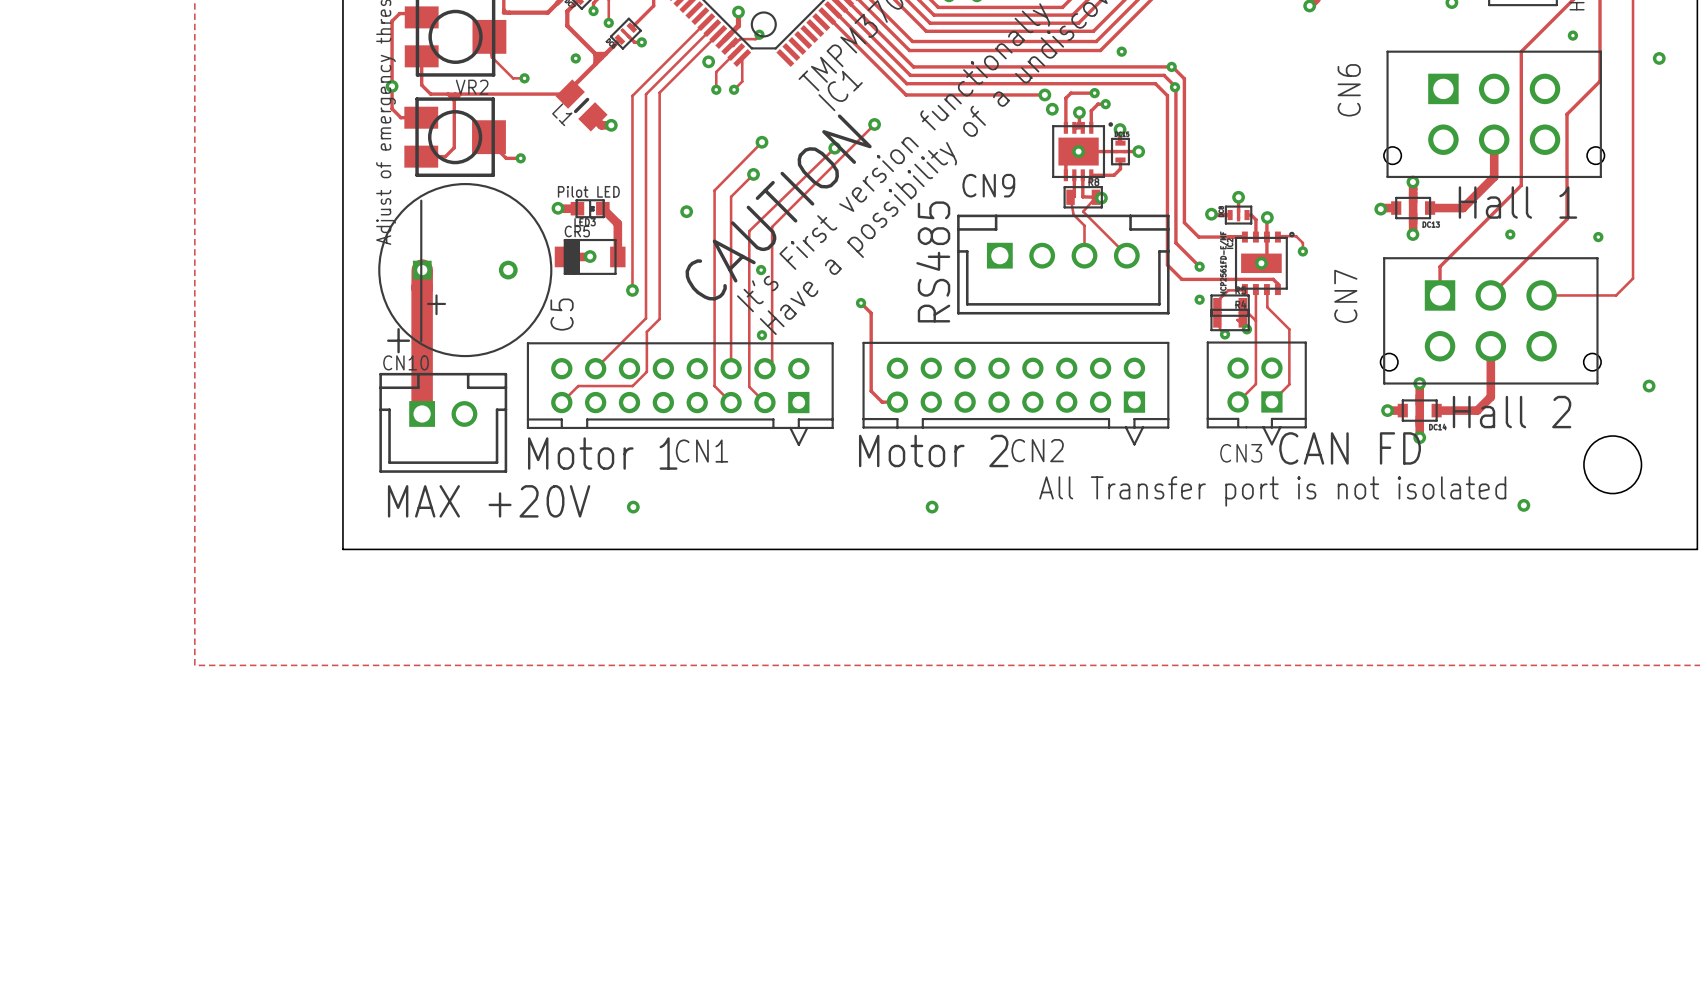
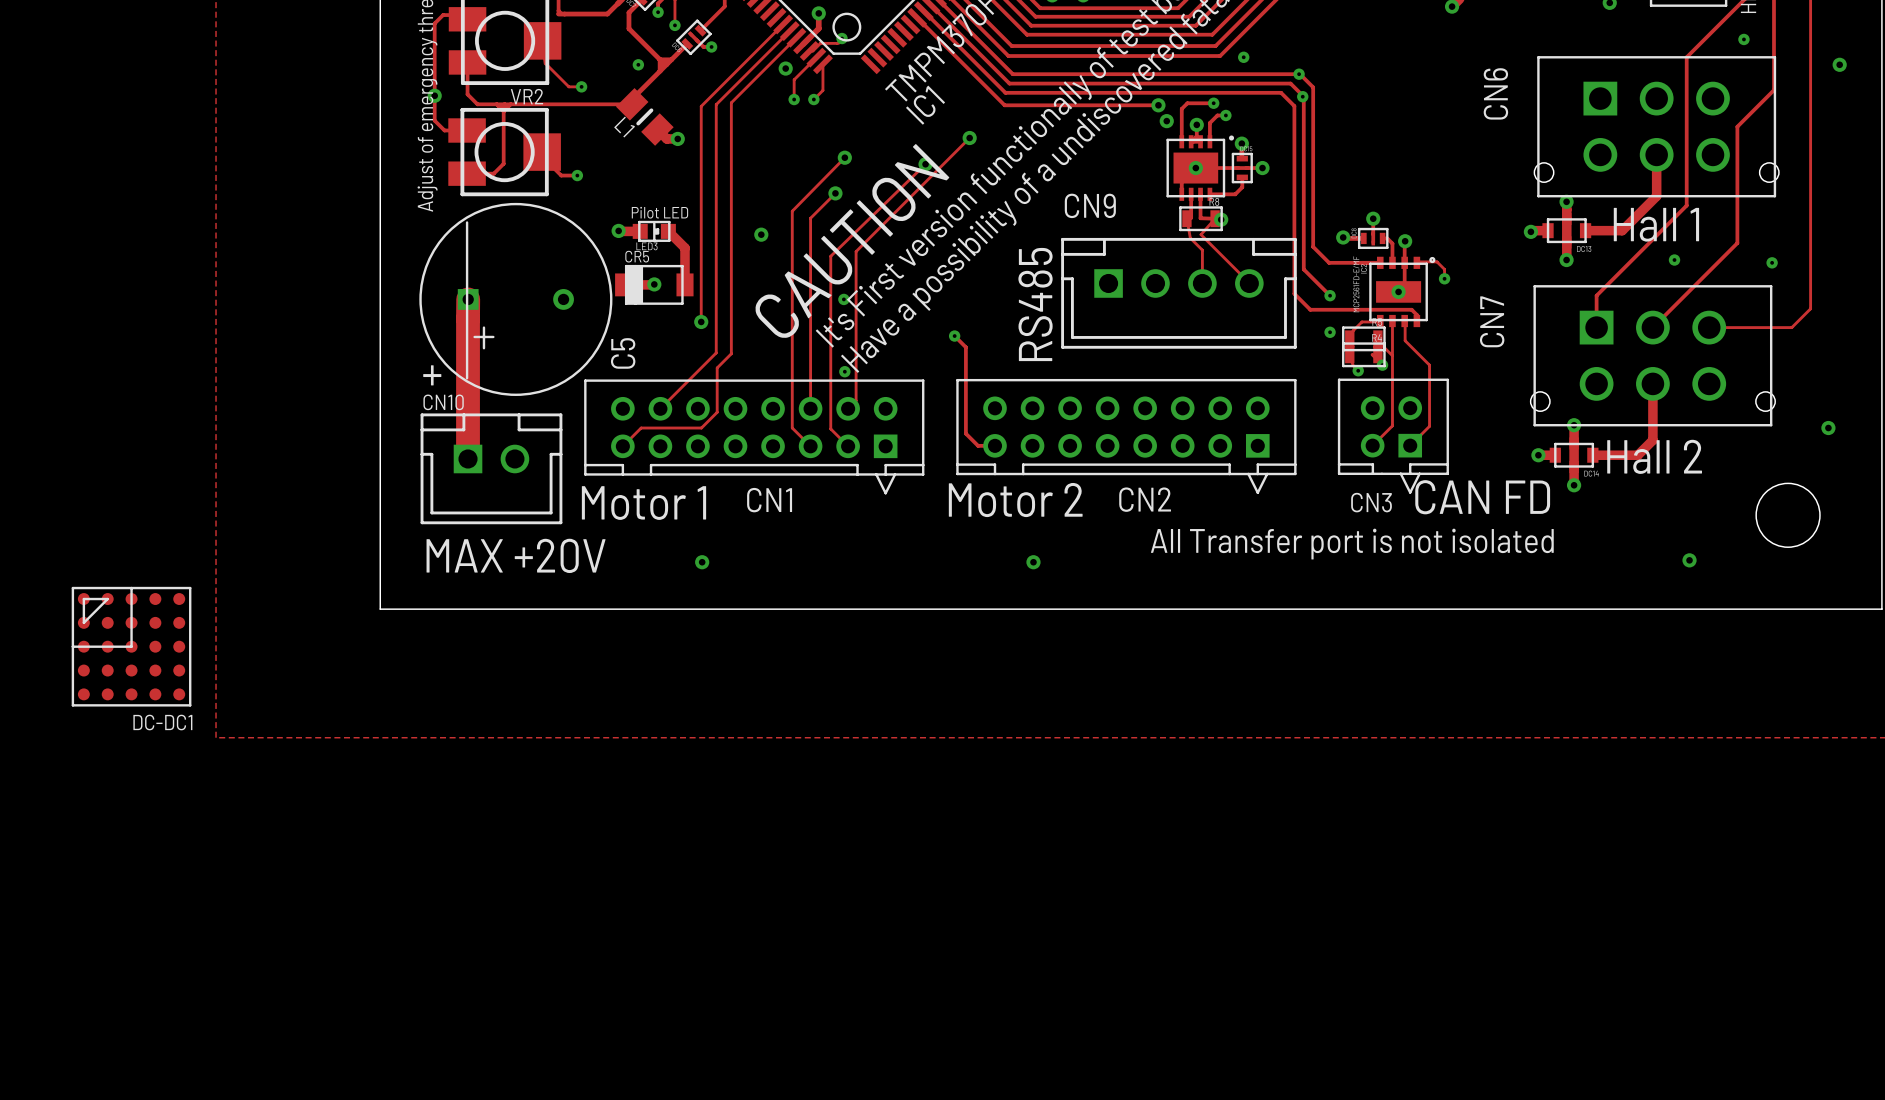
DC-DC1: none -> (131, 646)

